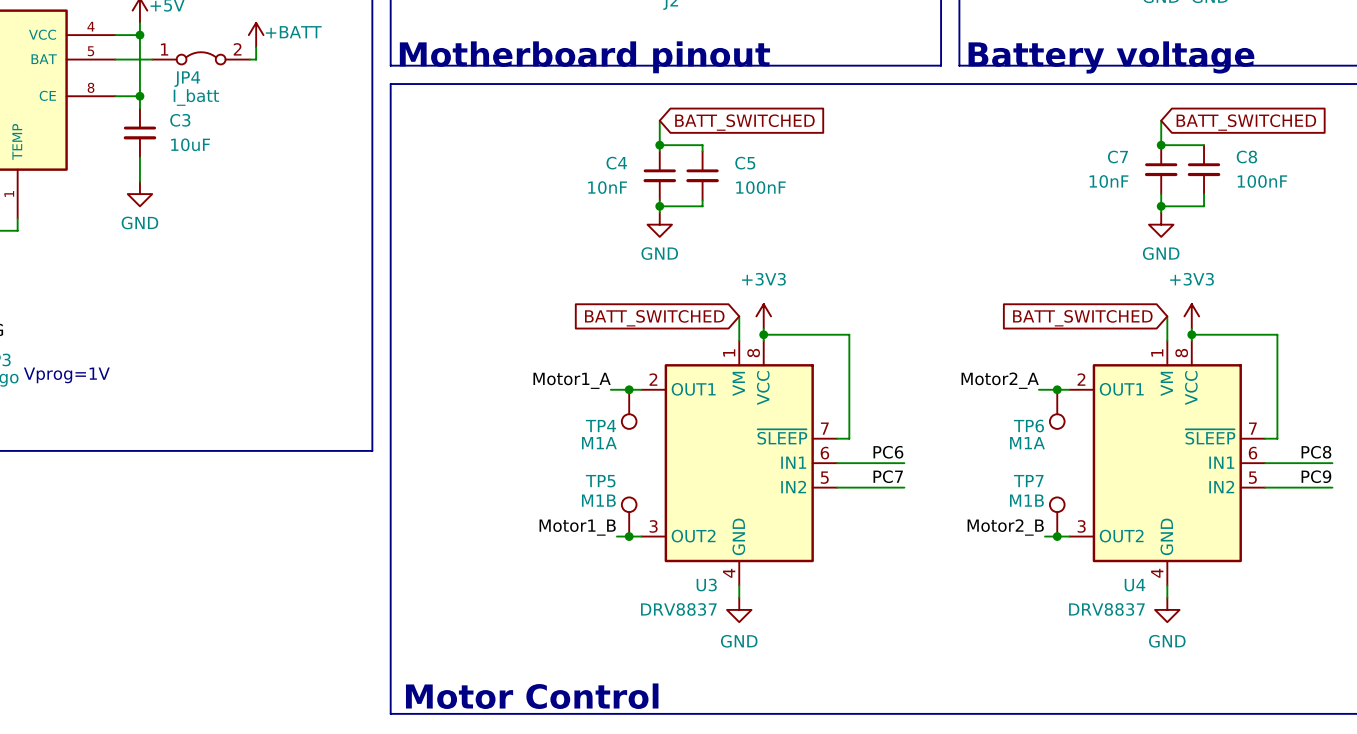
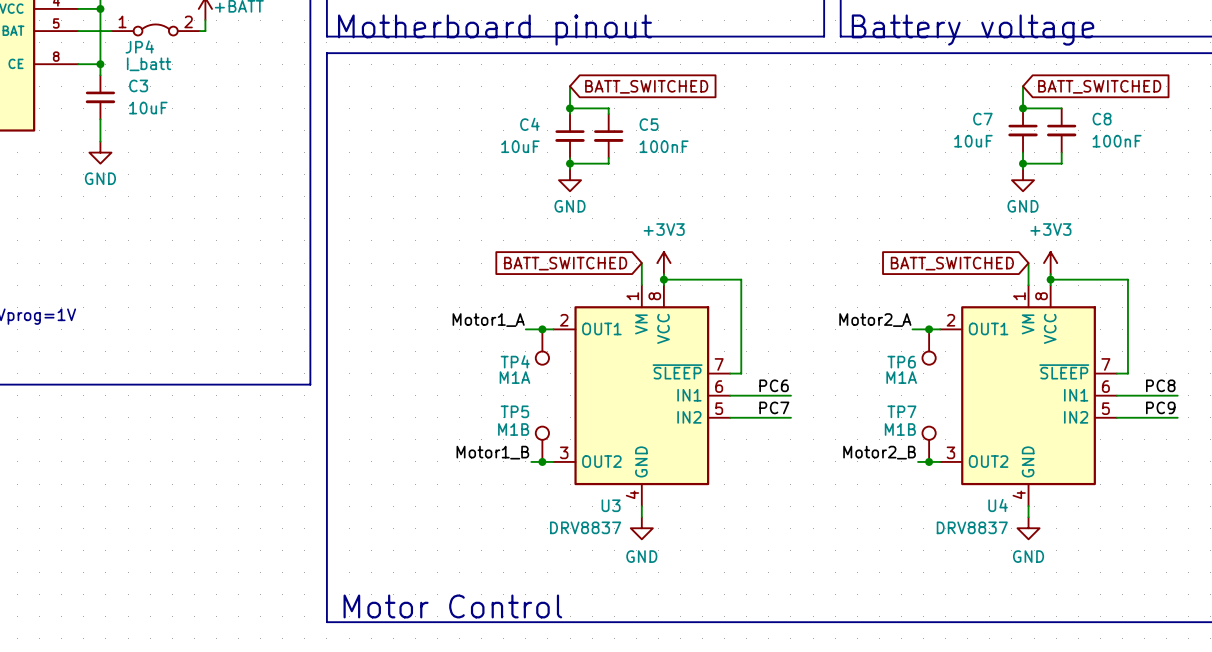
C7 value: 10nF (1109, 181) -> 10uF (973, 141)
C4 value: 10nF (607, 187) -> 10uF (520, 146)

